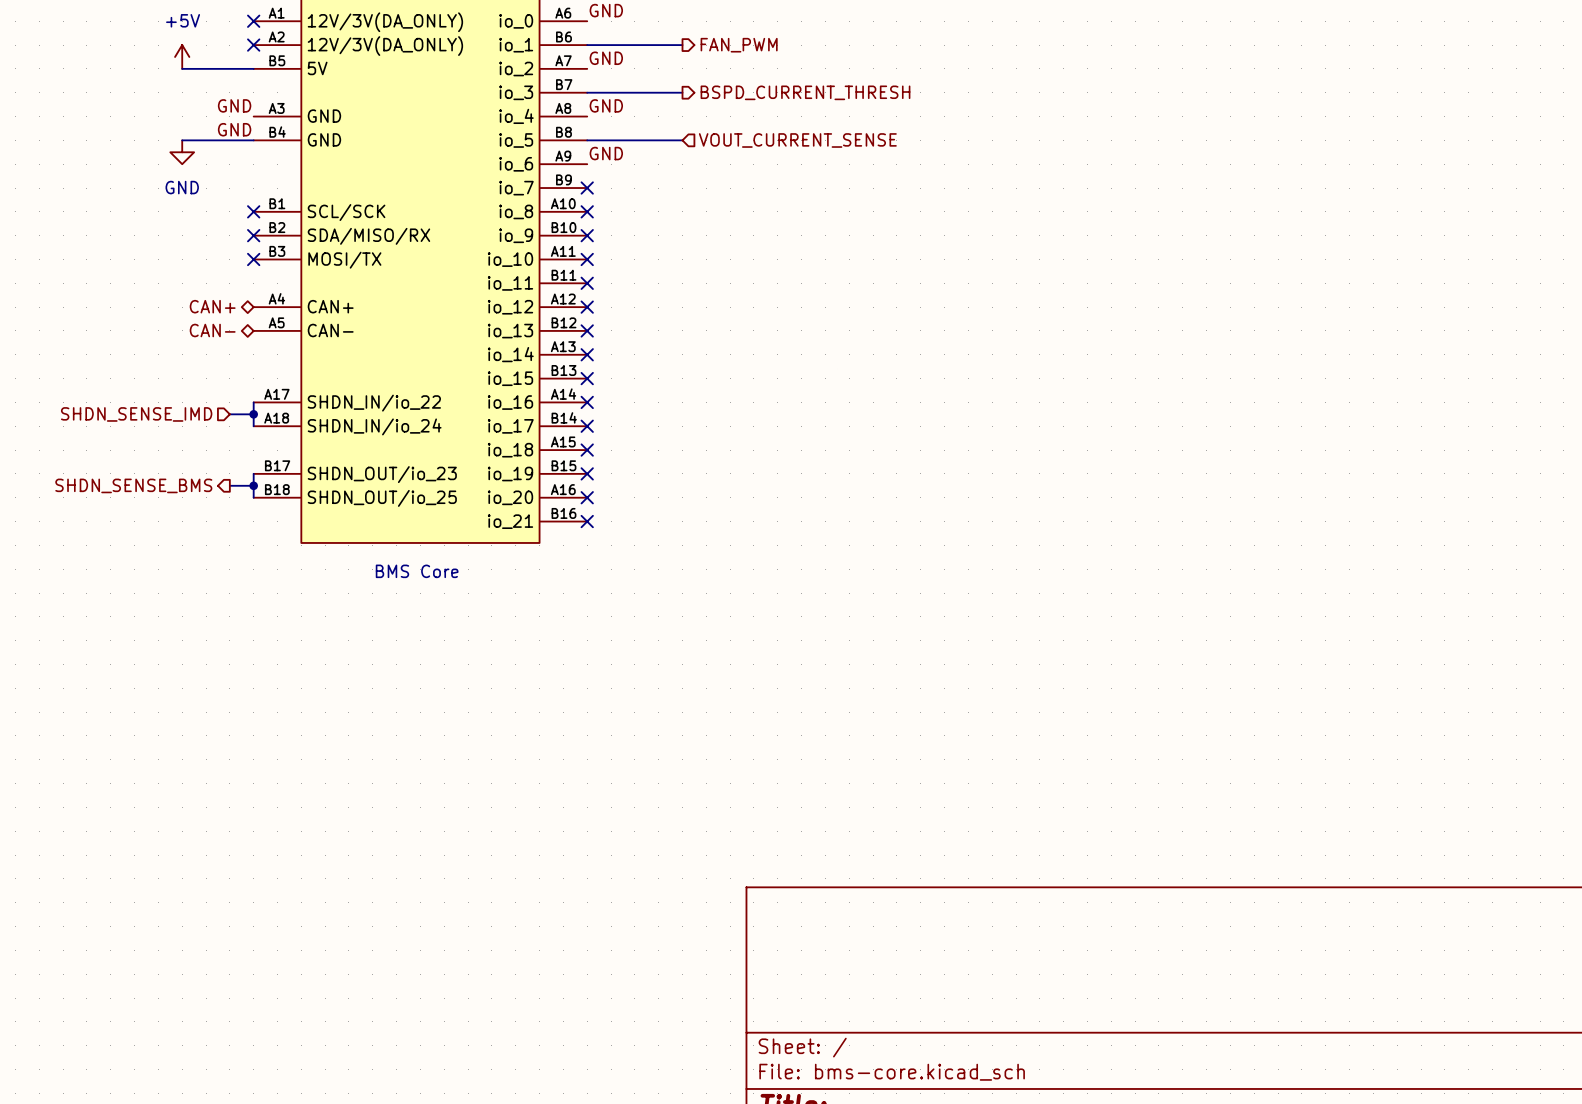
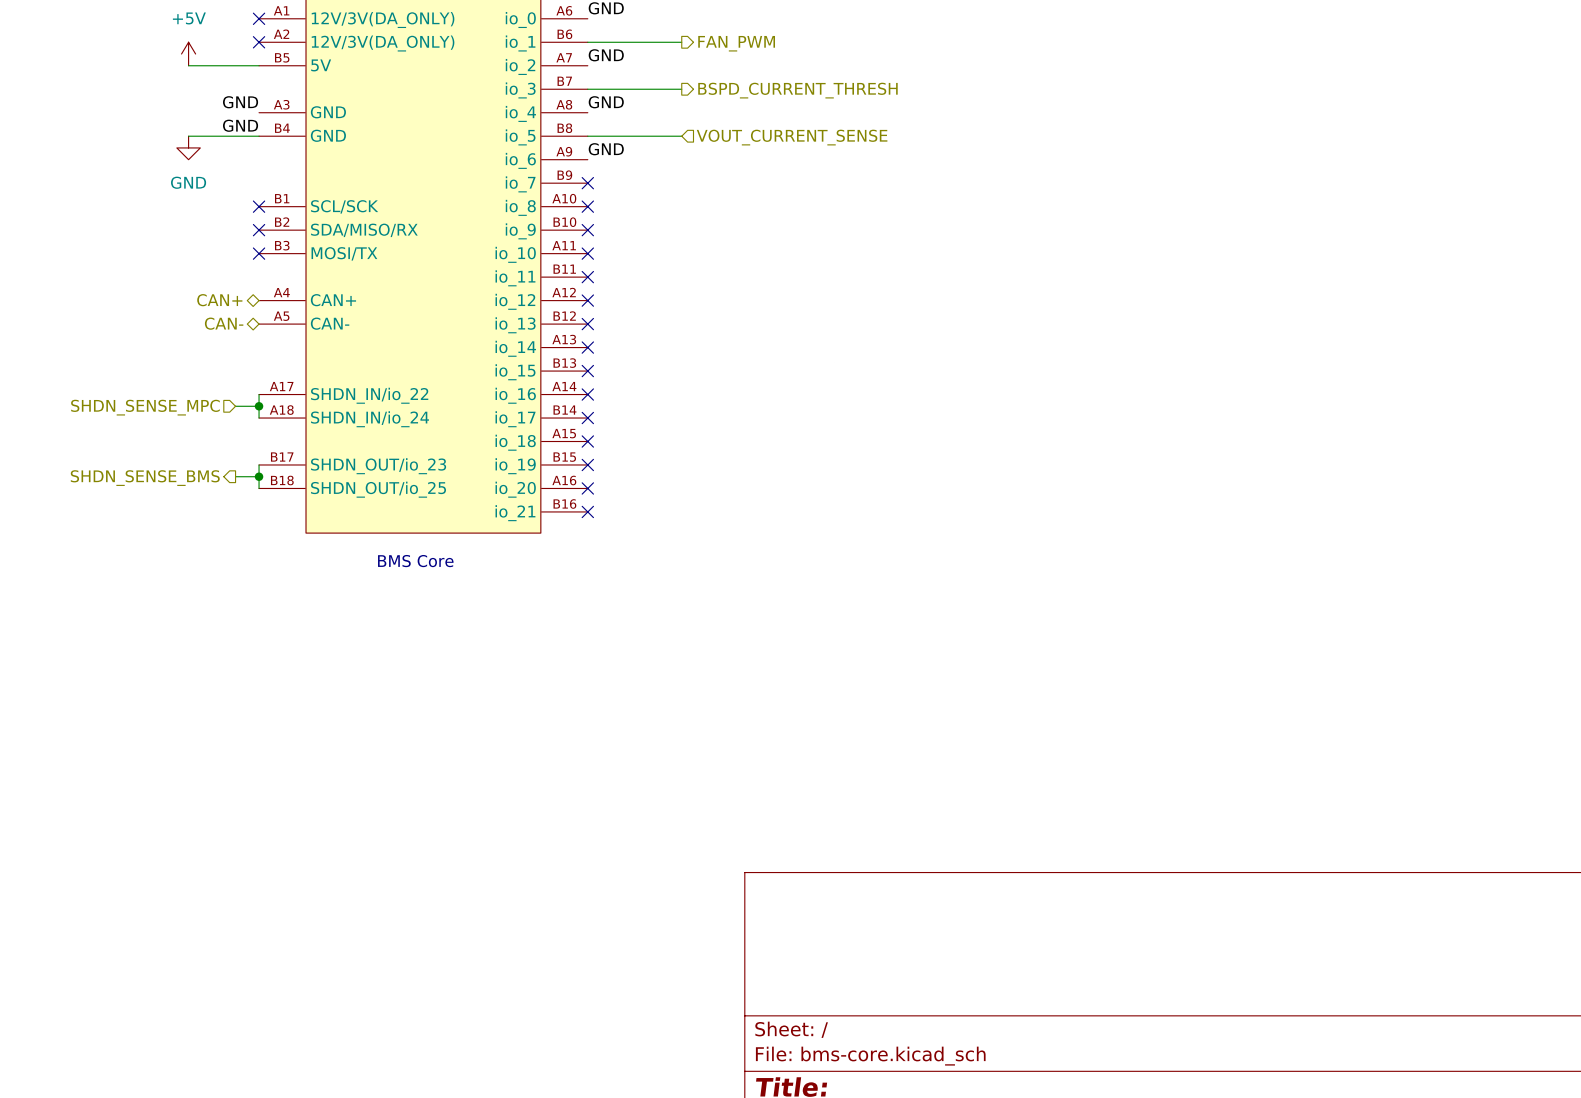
hierarchical label: SHDN_SENSE_IMD (136, 414) -> SHDN_SENSE_MPC (145, 407)

